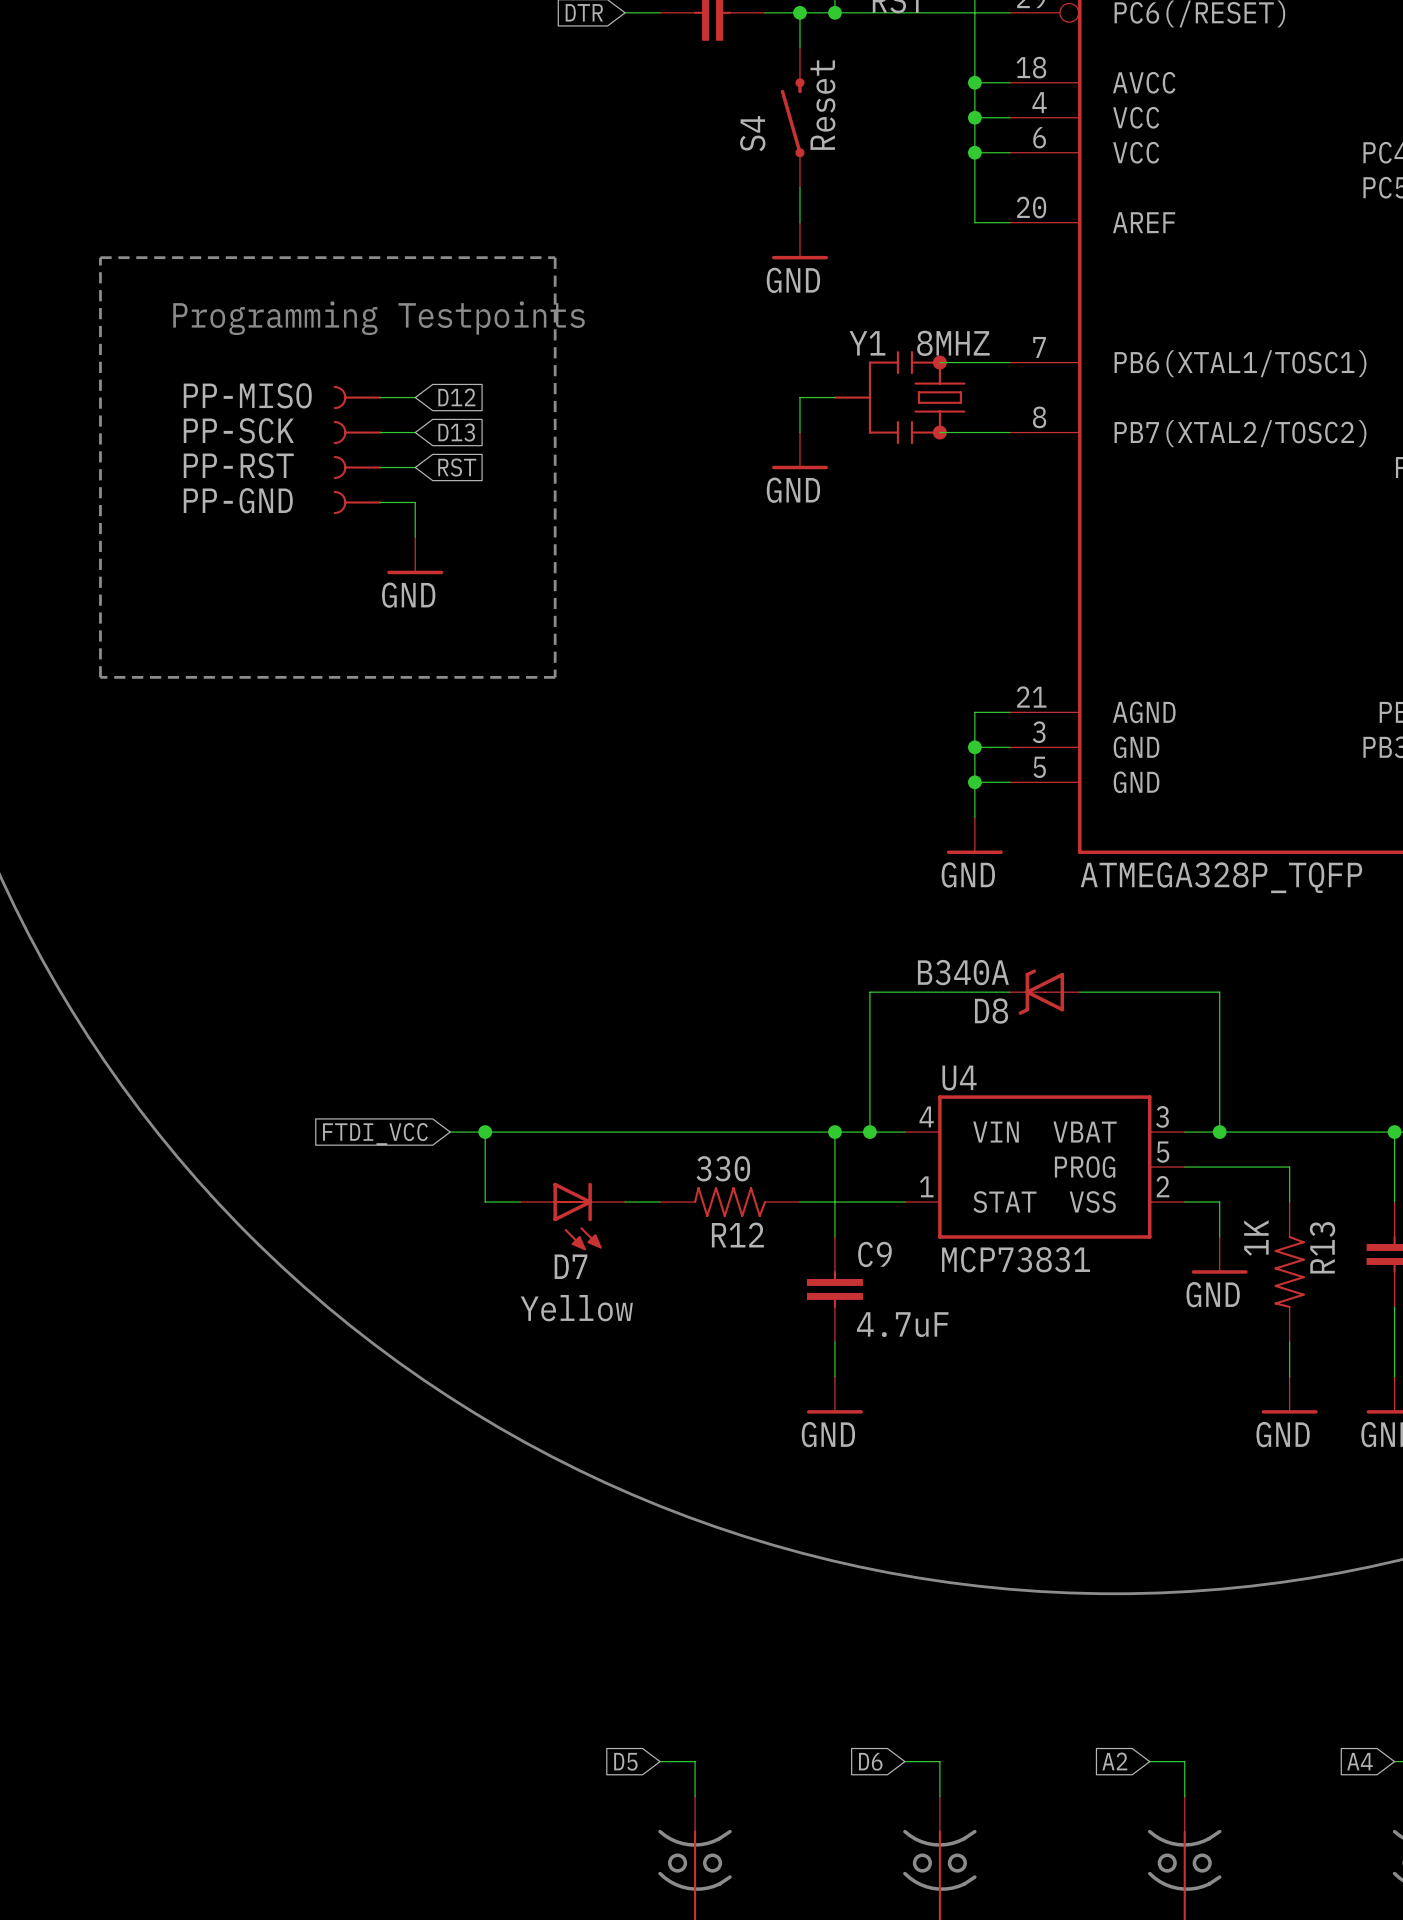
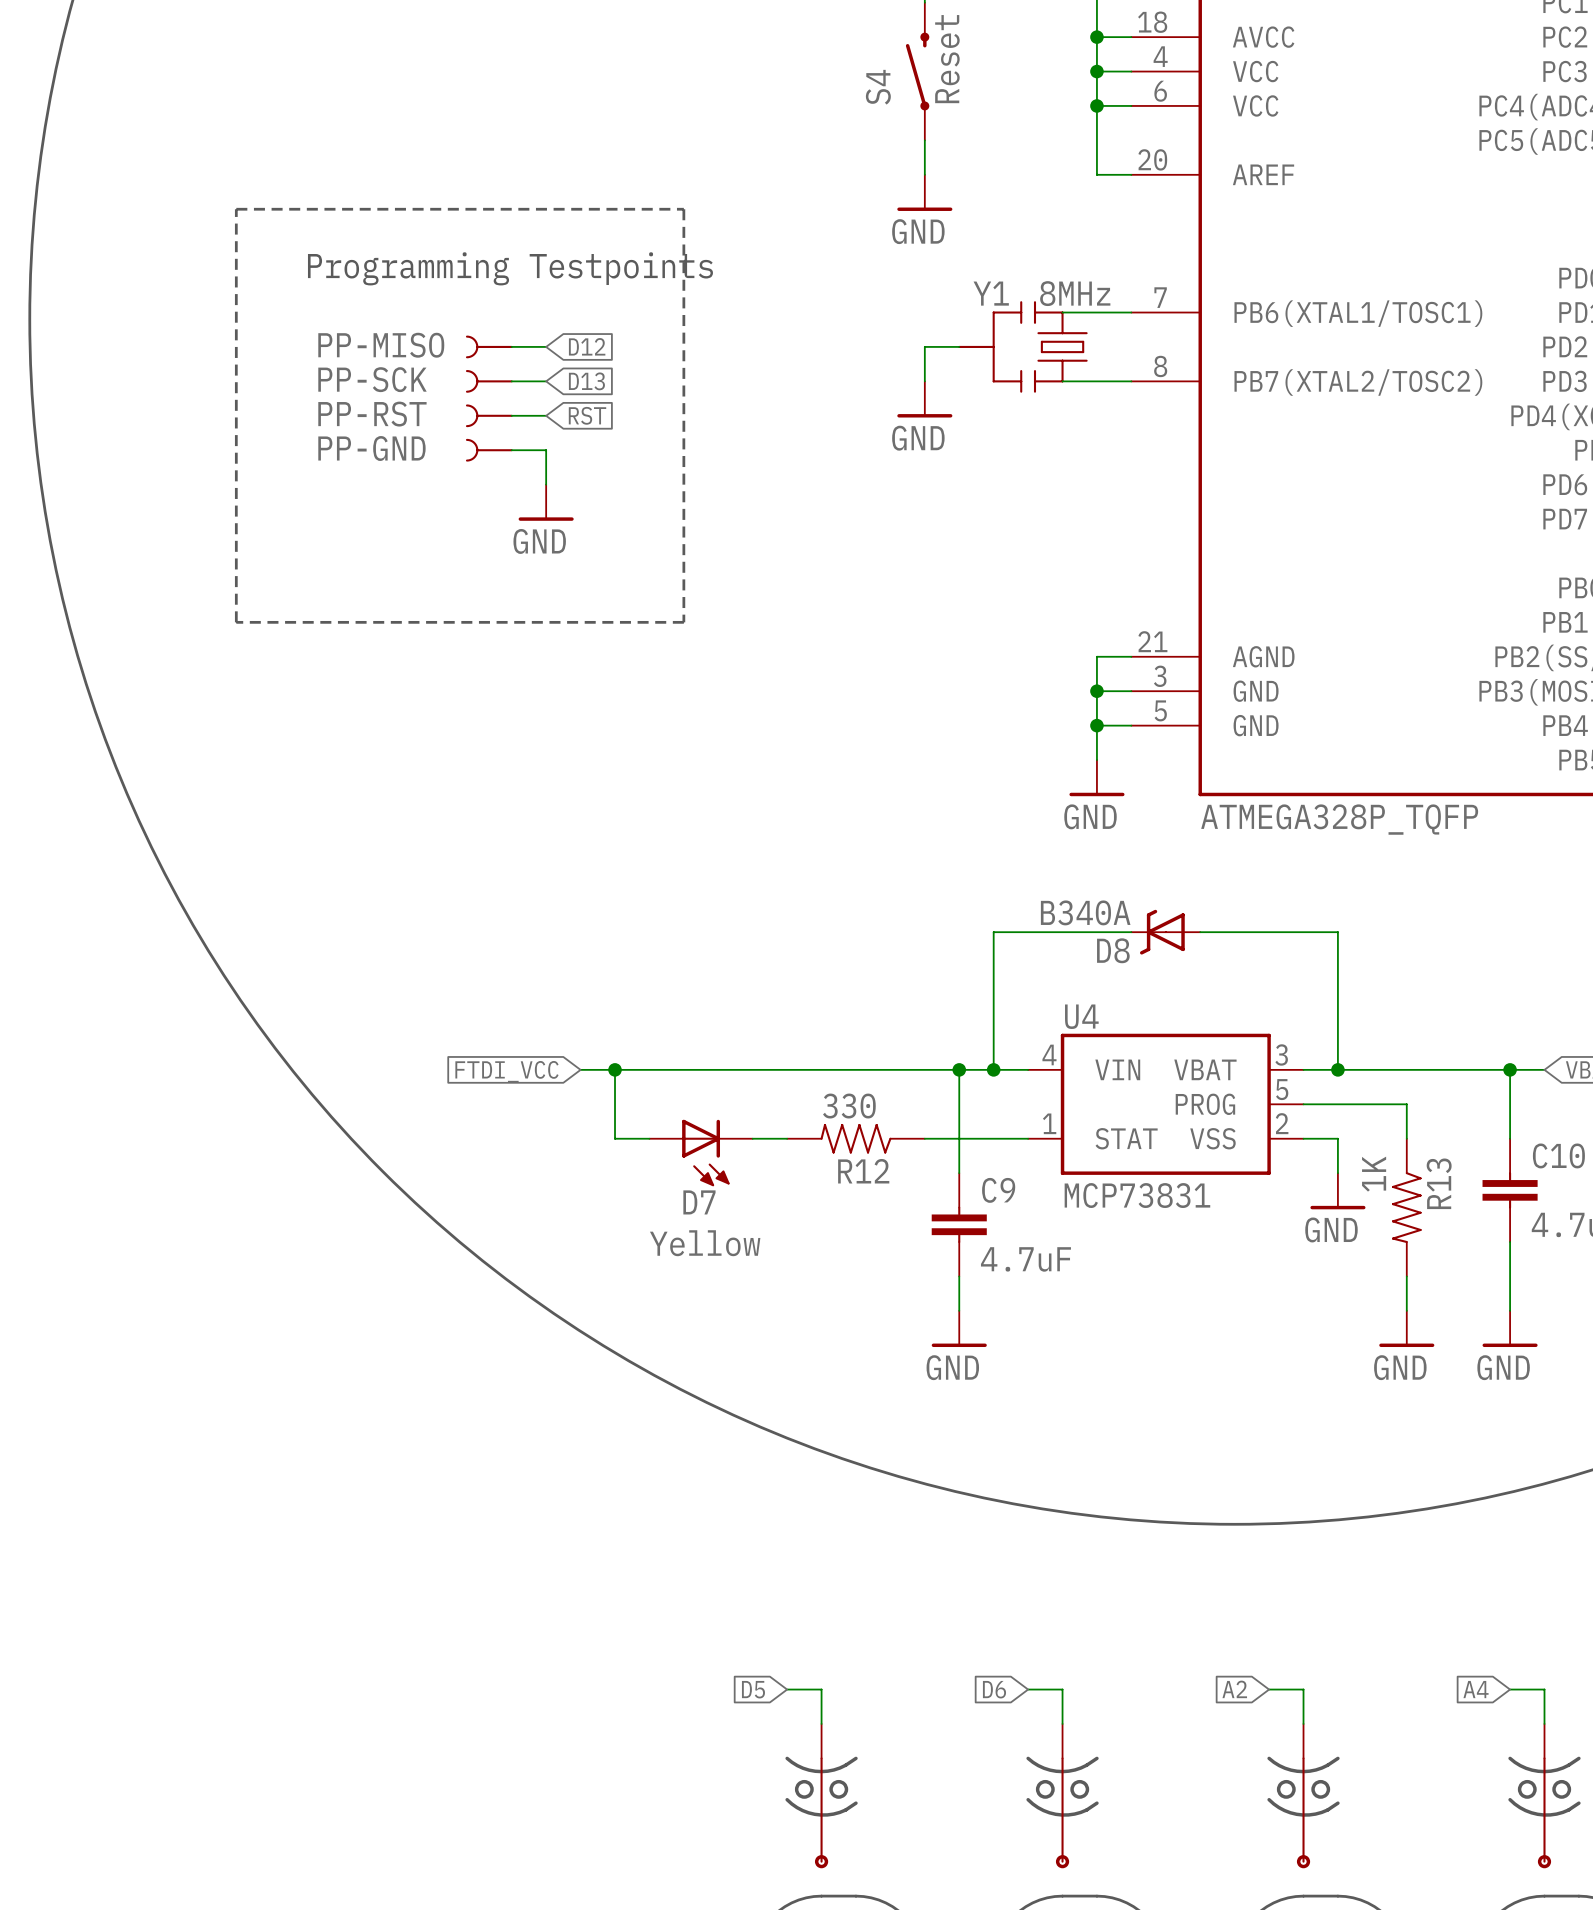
Y1 value: 8MHZ (953, 343) -> 8MHz (1075, 293)
Y1 symbol: [833, 351, 966, 445] -> [958, 301, 1088, 393]

